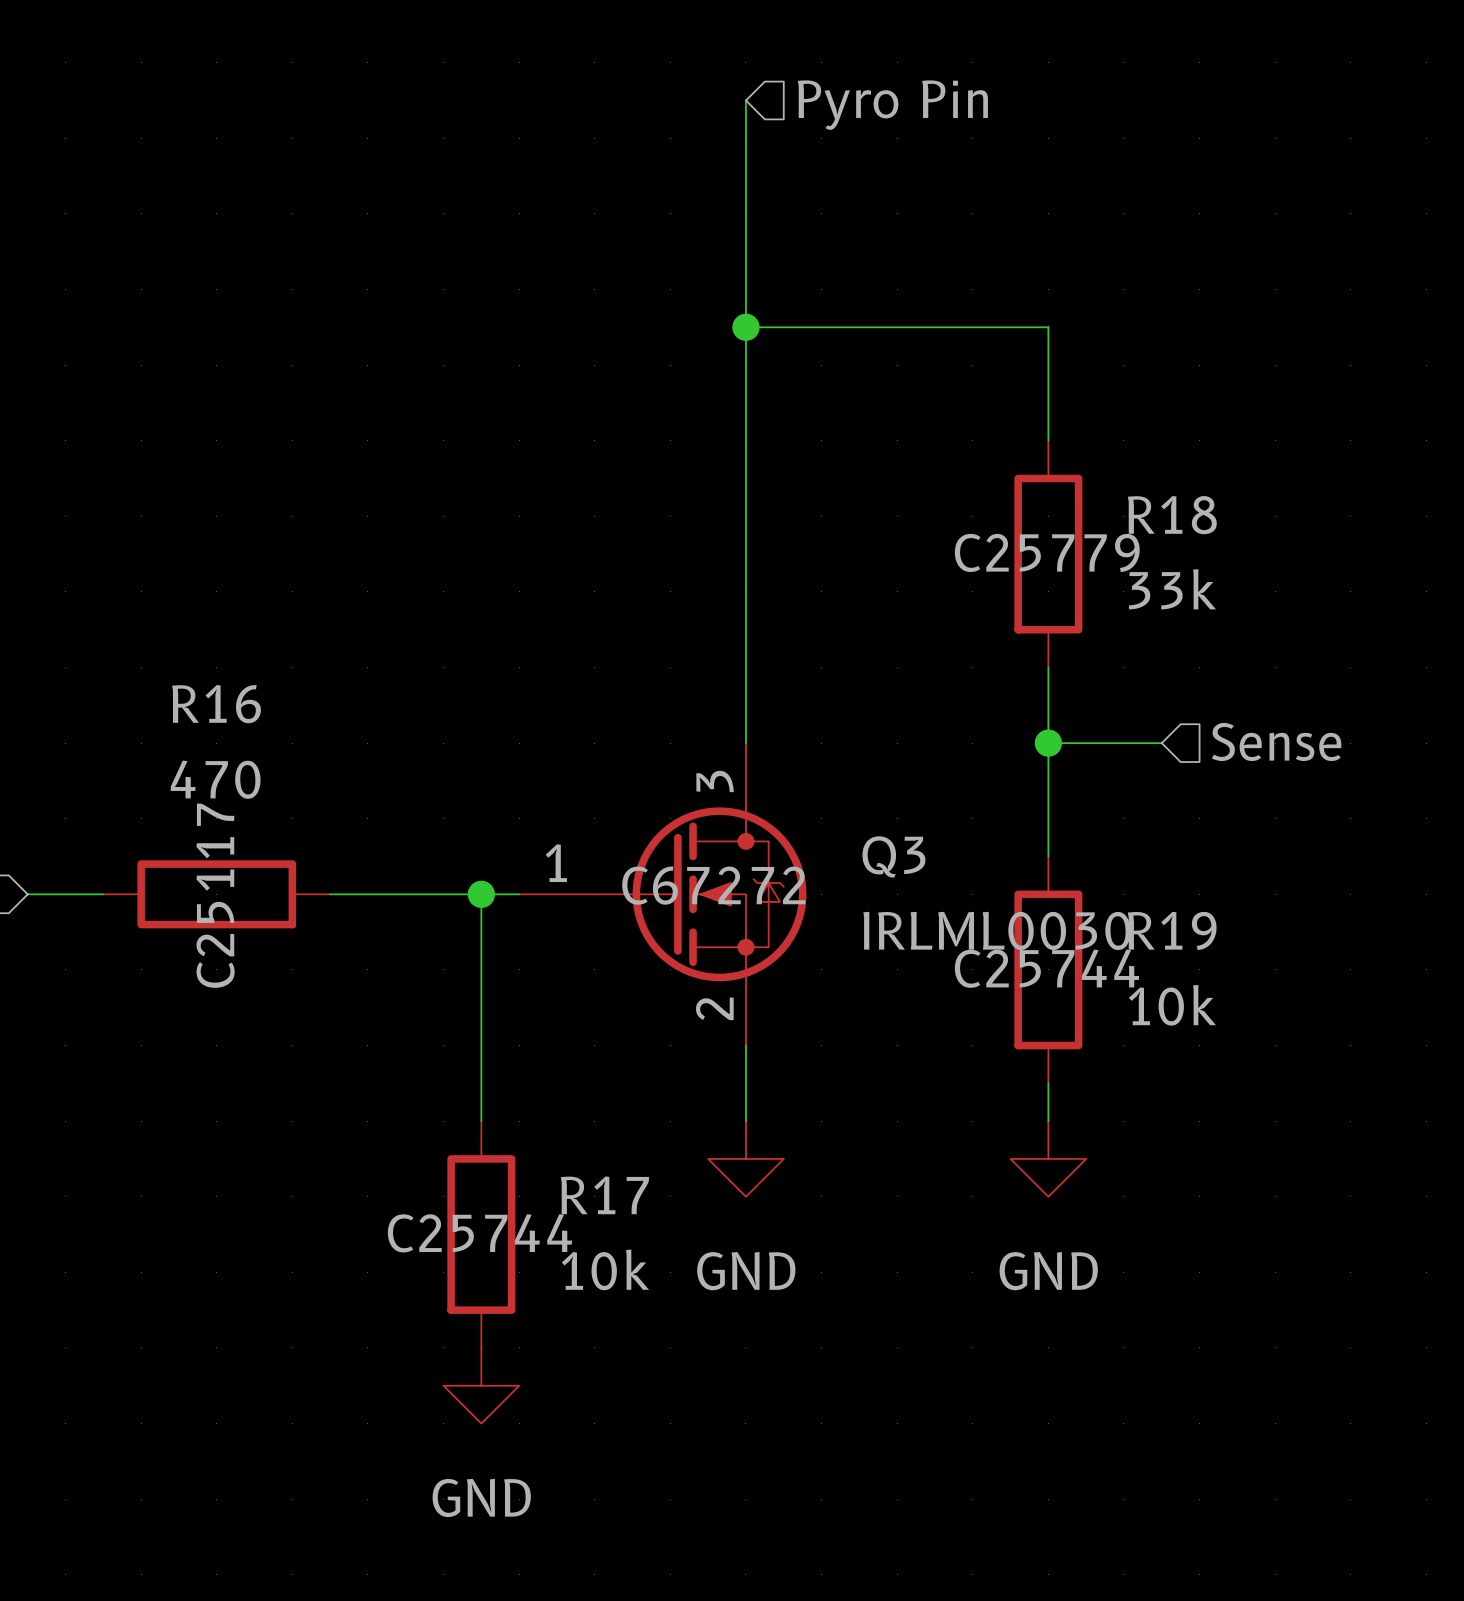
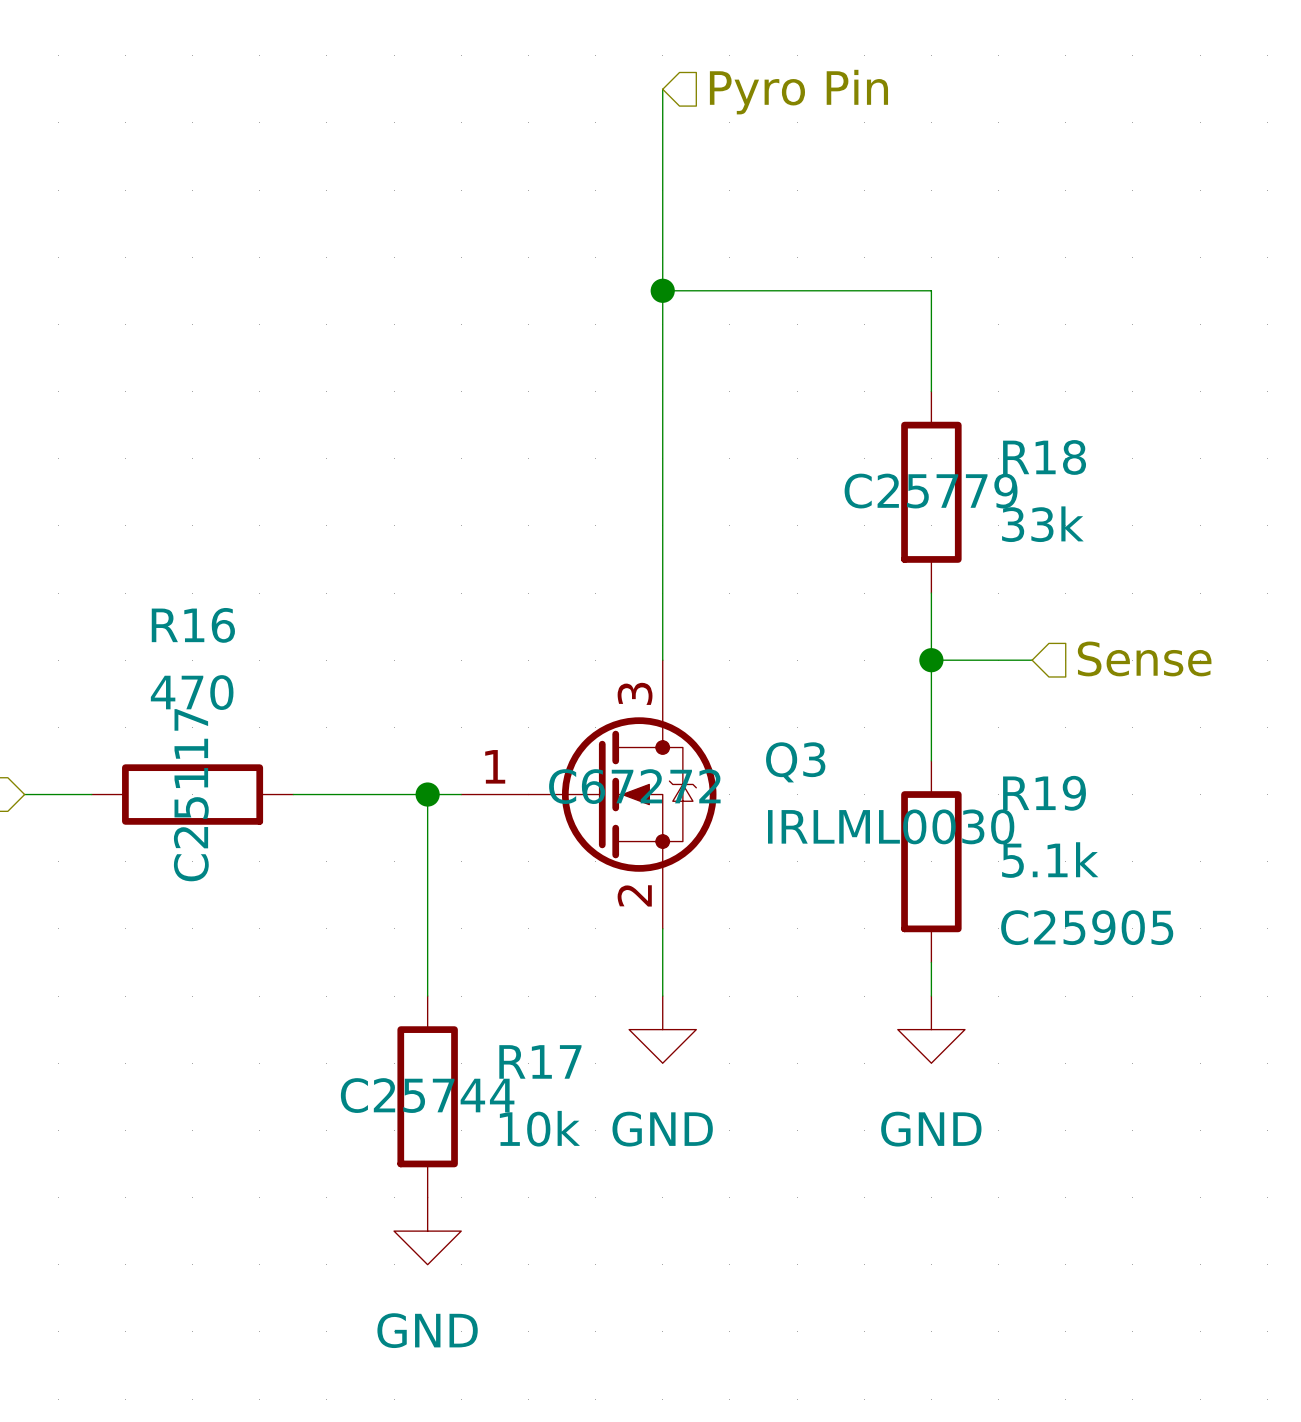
R19 name position: R19 (1172, 930) -> R19 (1044, 793)
R19 text: C25744 (1047, 968) -> C25905 (1087, 927)
R19 value: 10k (1172, 1005) -> 5.1k (1050, 860)

